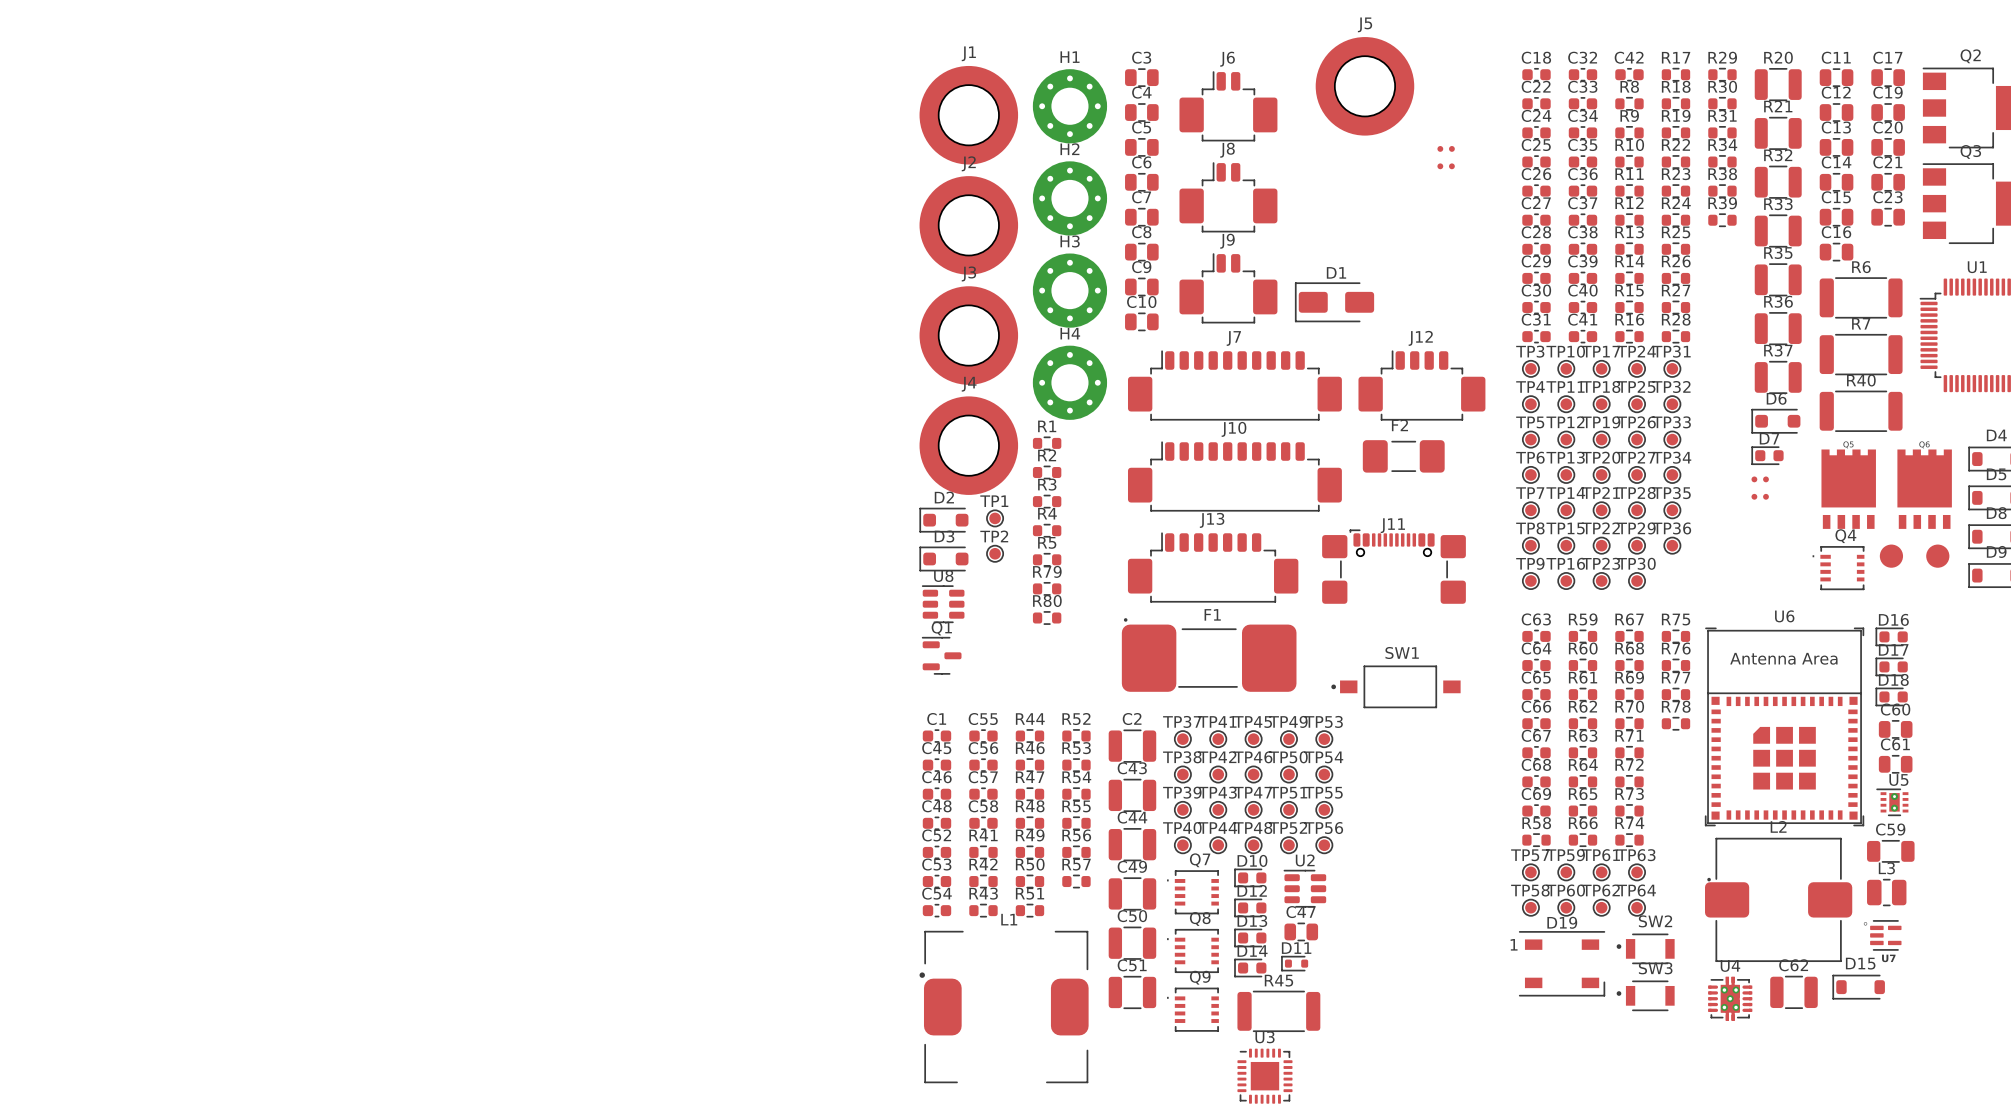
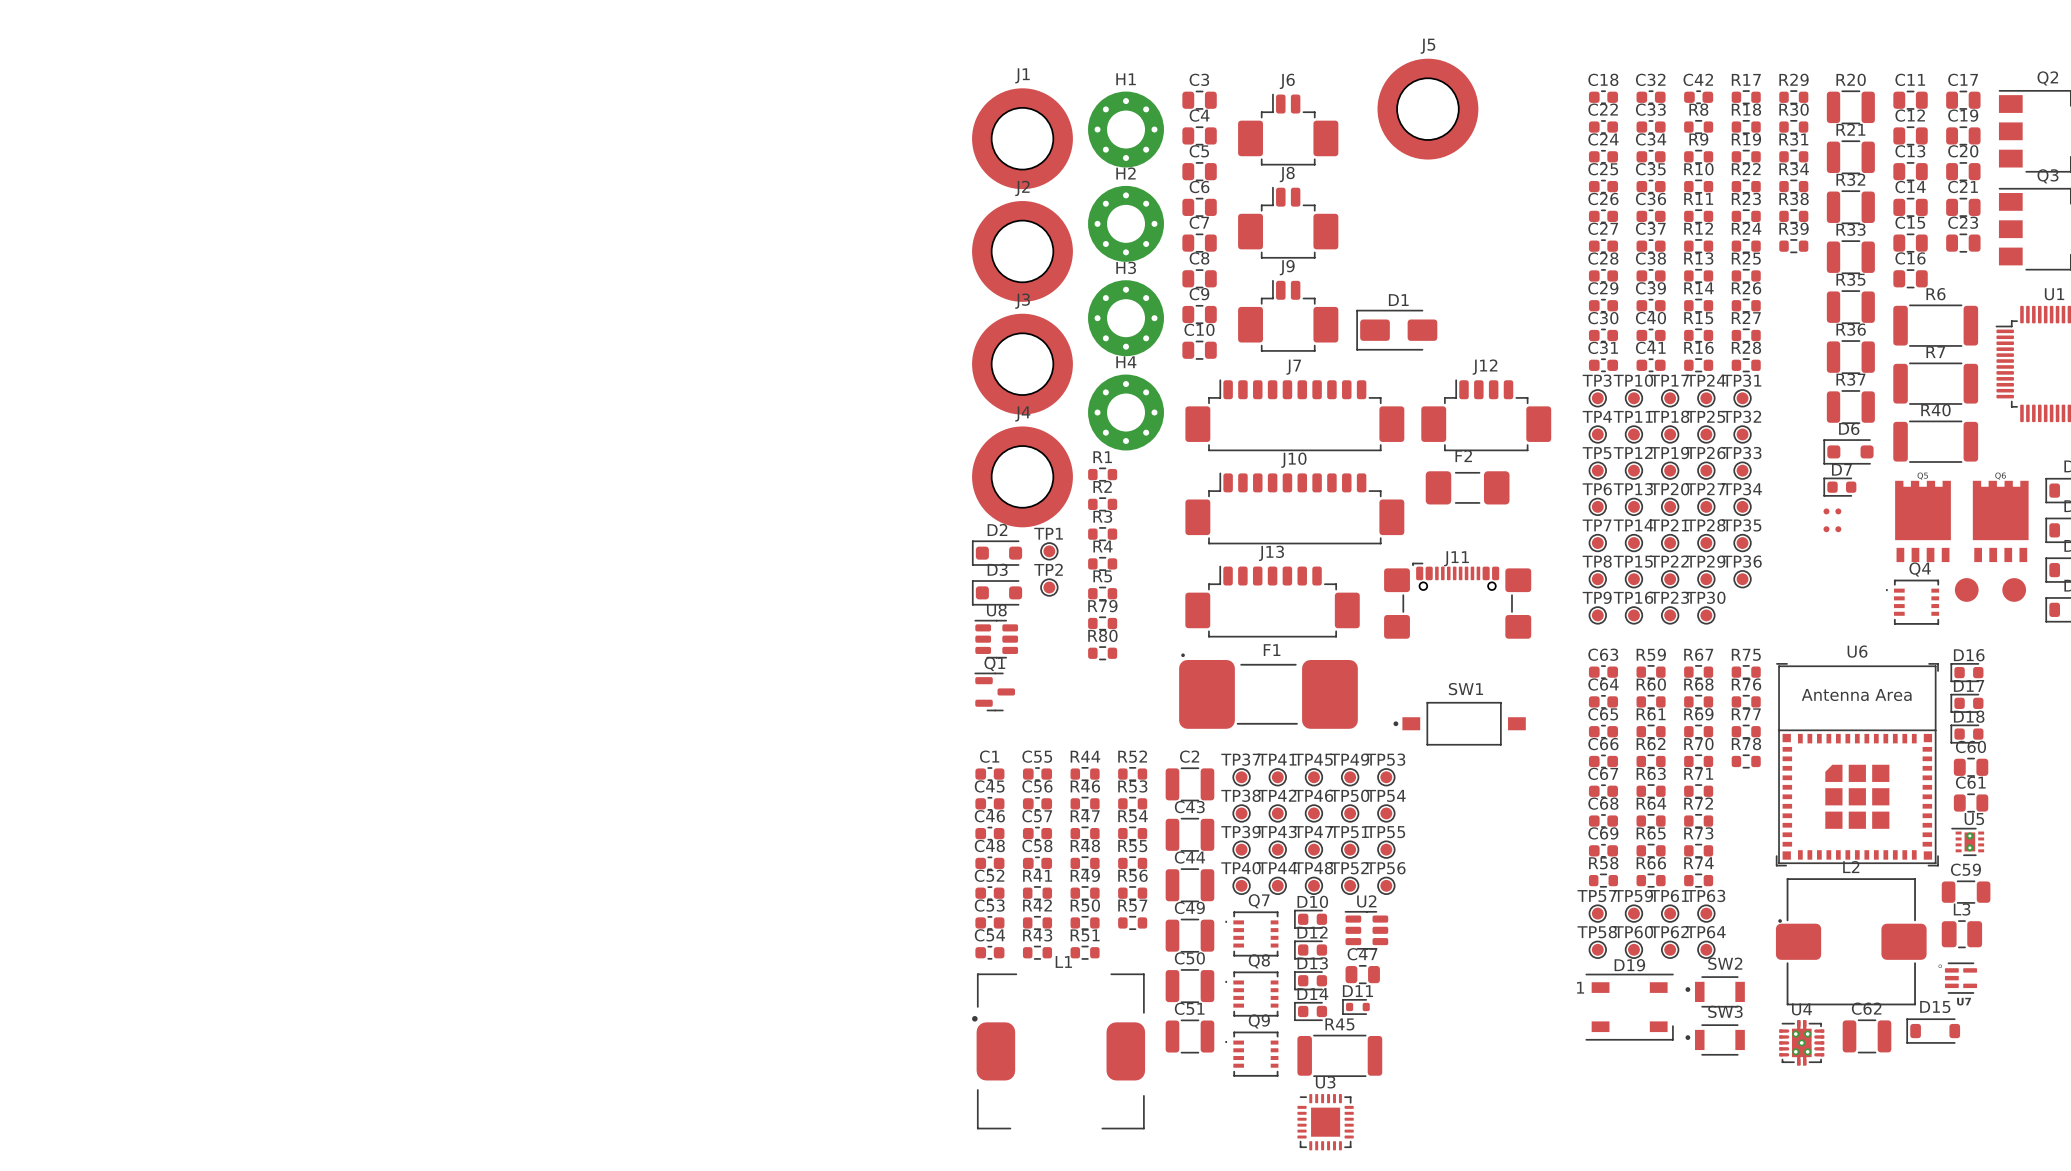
part: (1446, 148) -> none
part: (1446, 166) -> none

